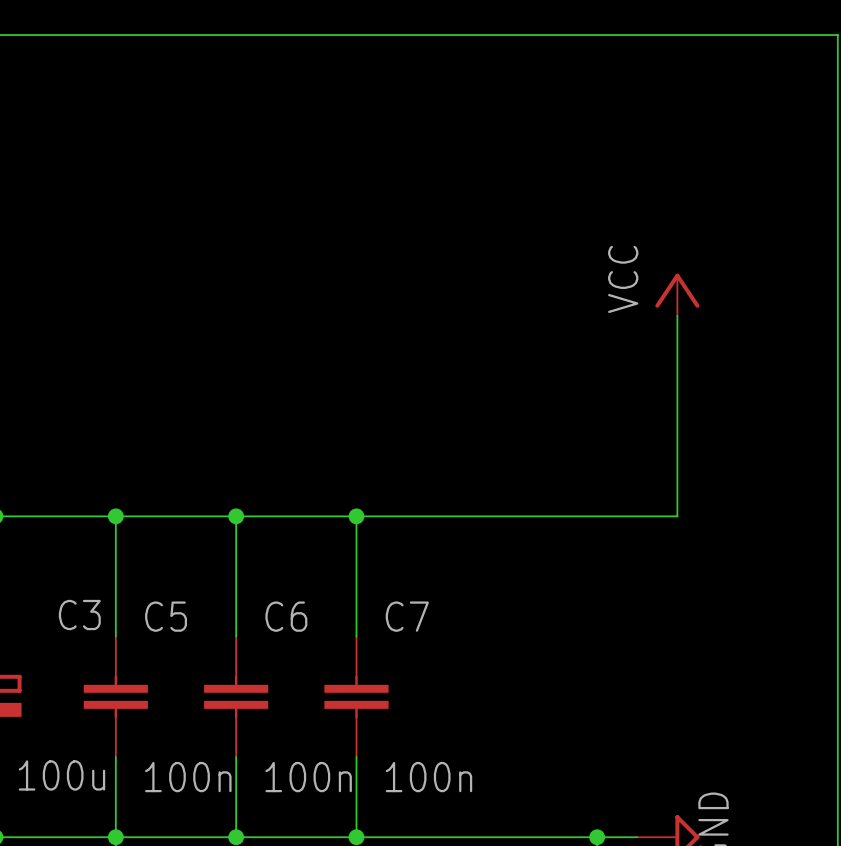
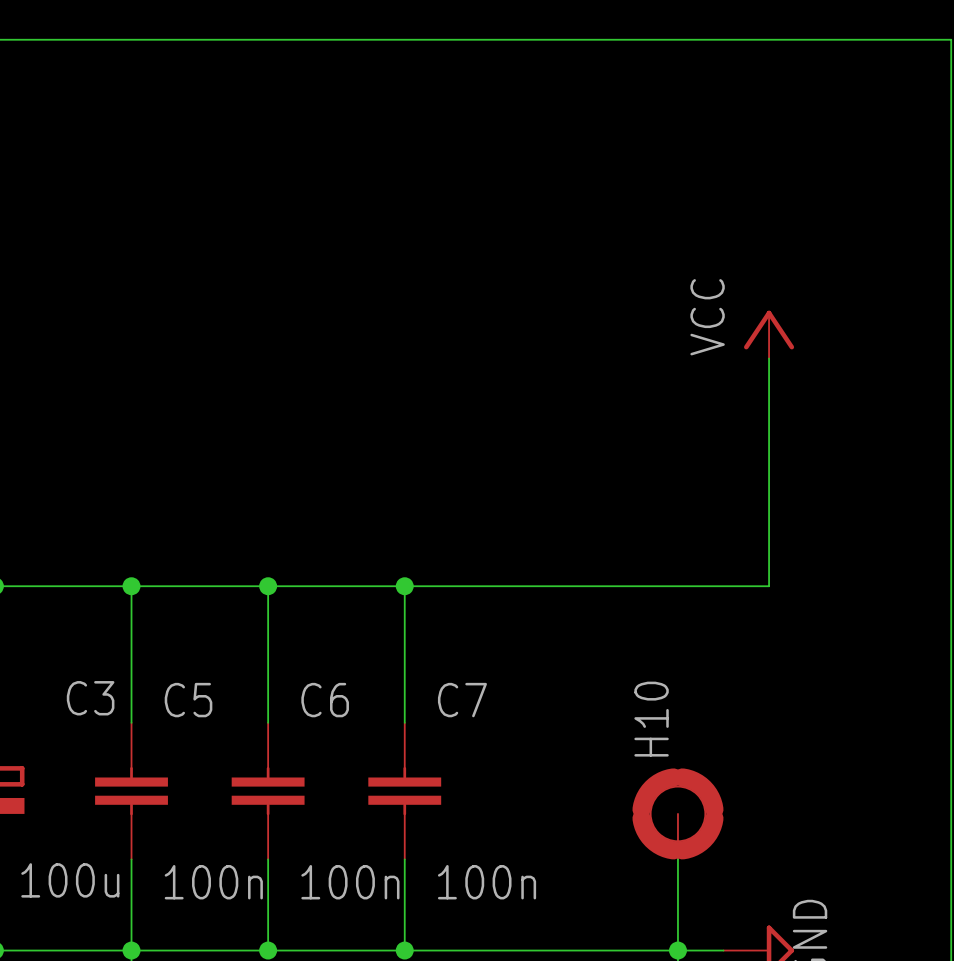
H10: none -> (677, 813)
wire: none -> (677, 859) (677, 950)

